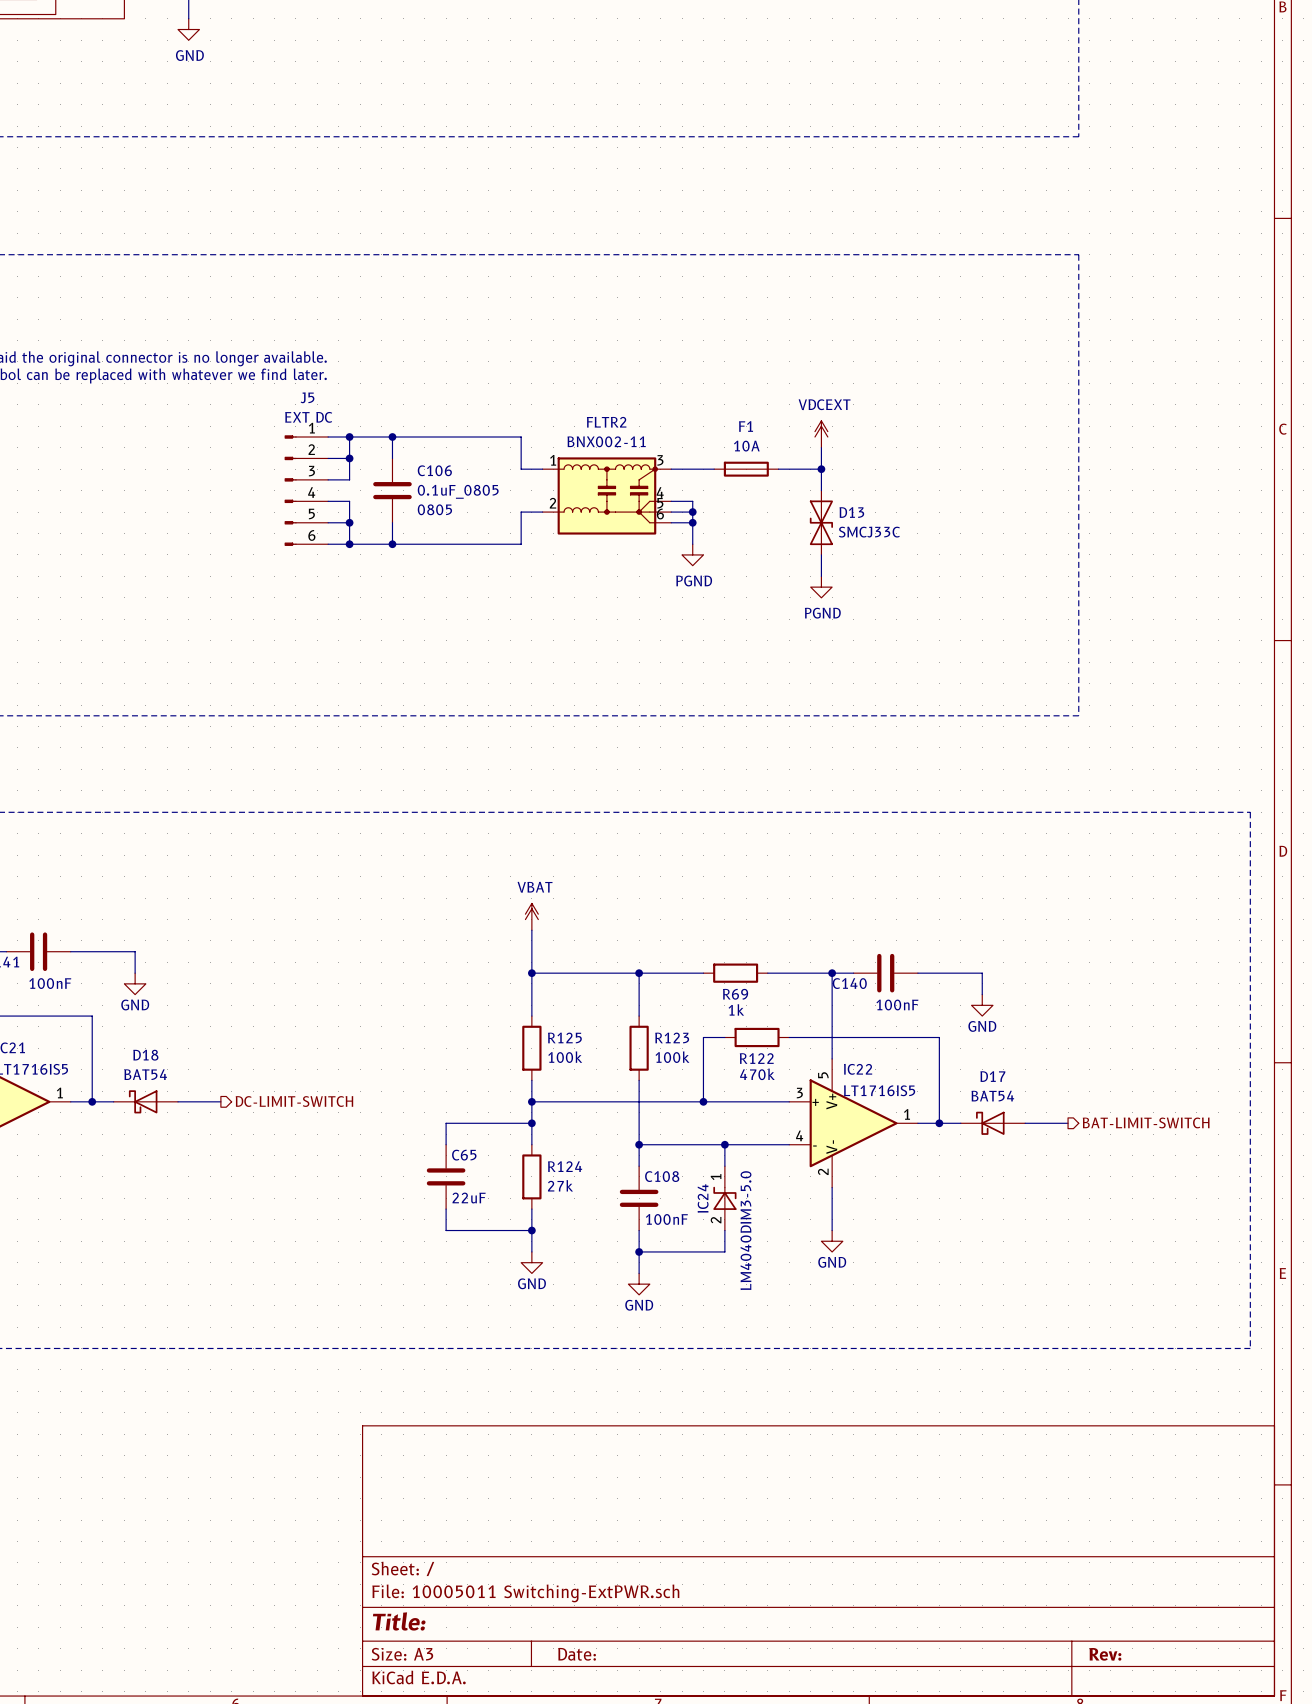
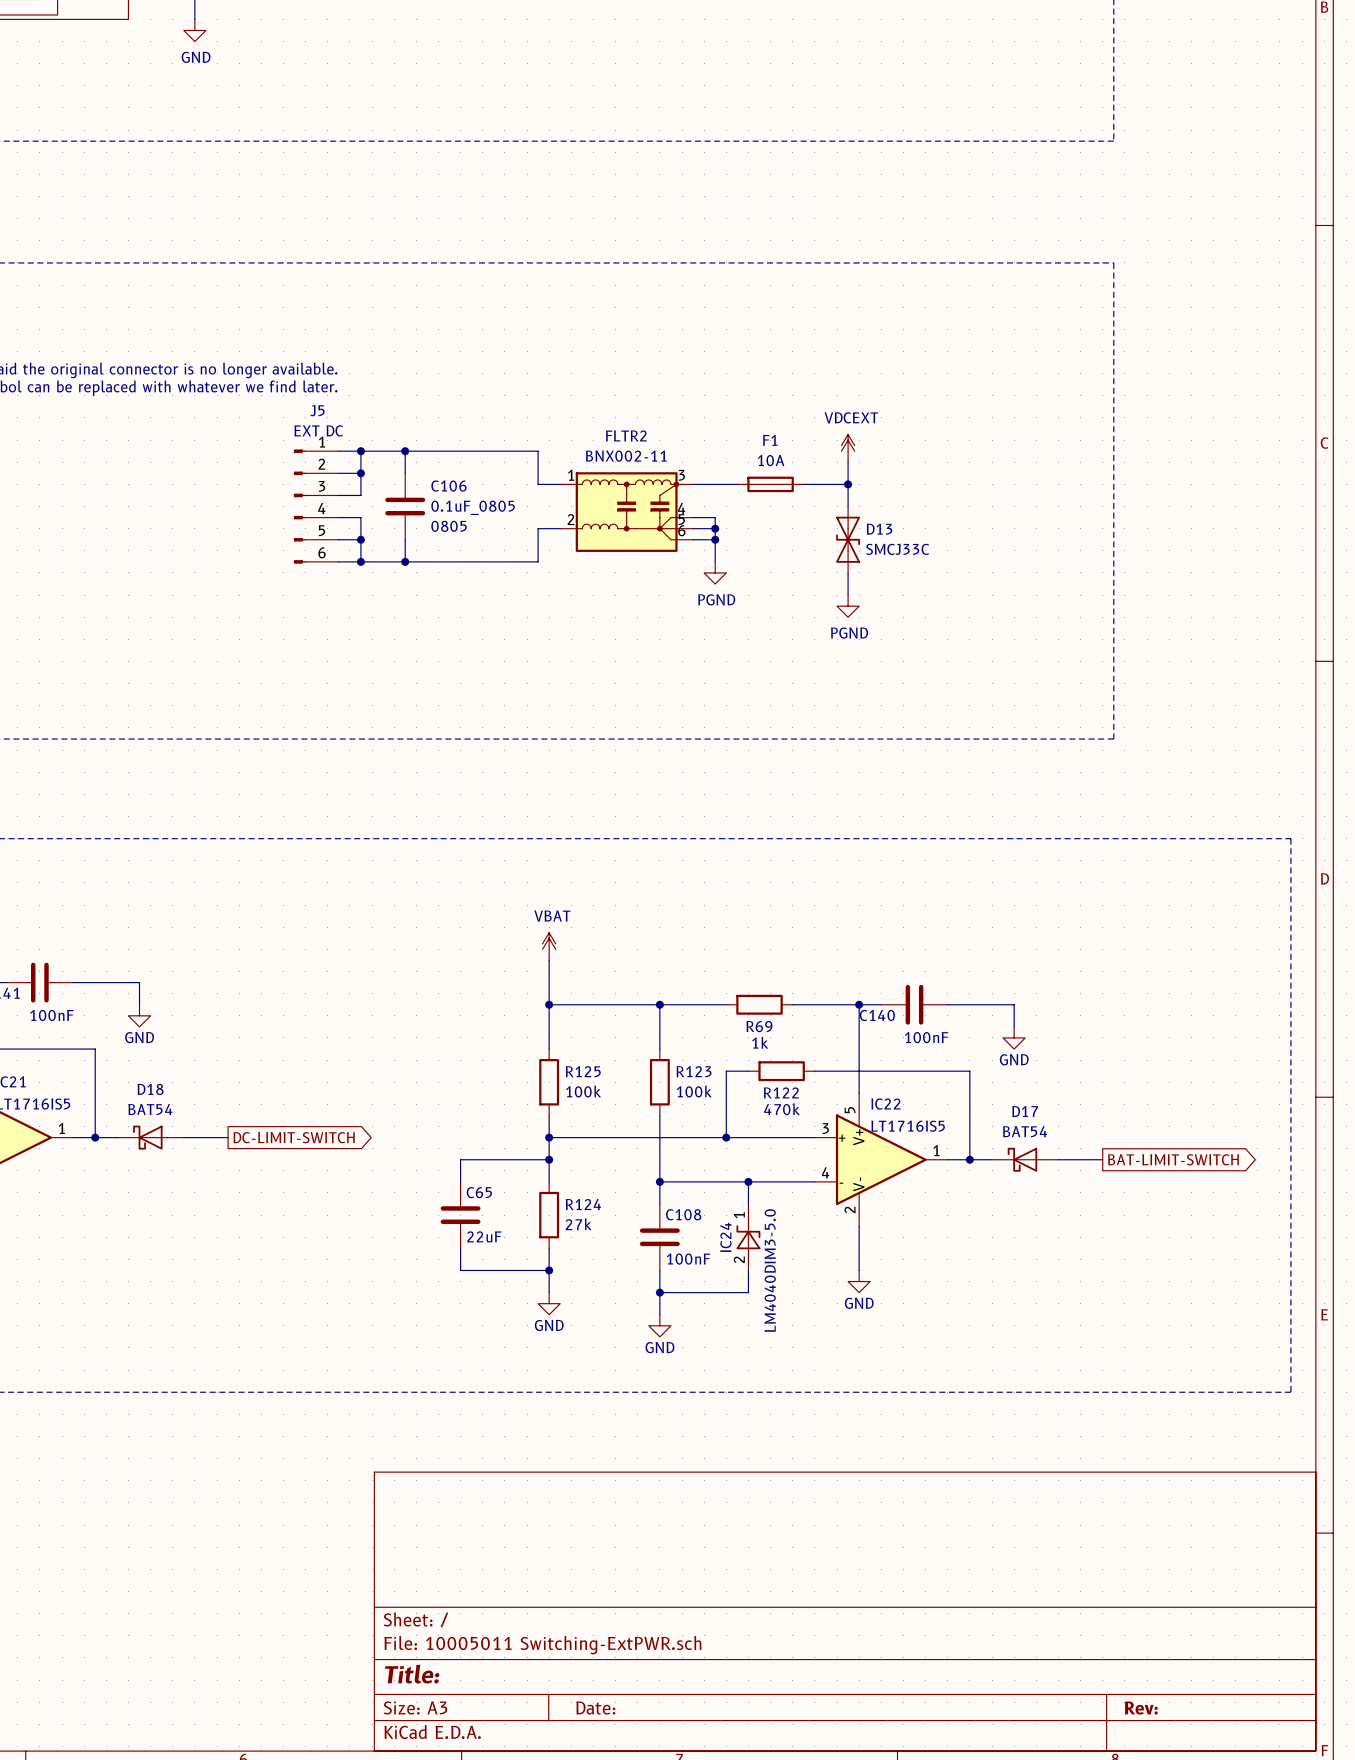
global label: none -> DC-LIMIT-SWITCH (294, 1137)
hierarchical label: DC-LIMIT-SWITCH (294, 1101) -> none
hierarchical label: BAT-LIMIT-SWITCH (1146, 1122) -> none
global label: none -> BAT-LIMIT-SWITCH (1173, 1159)

